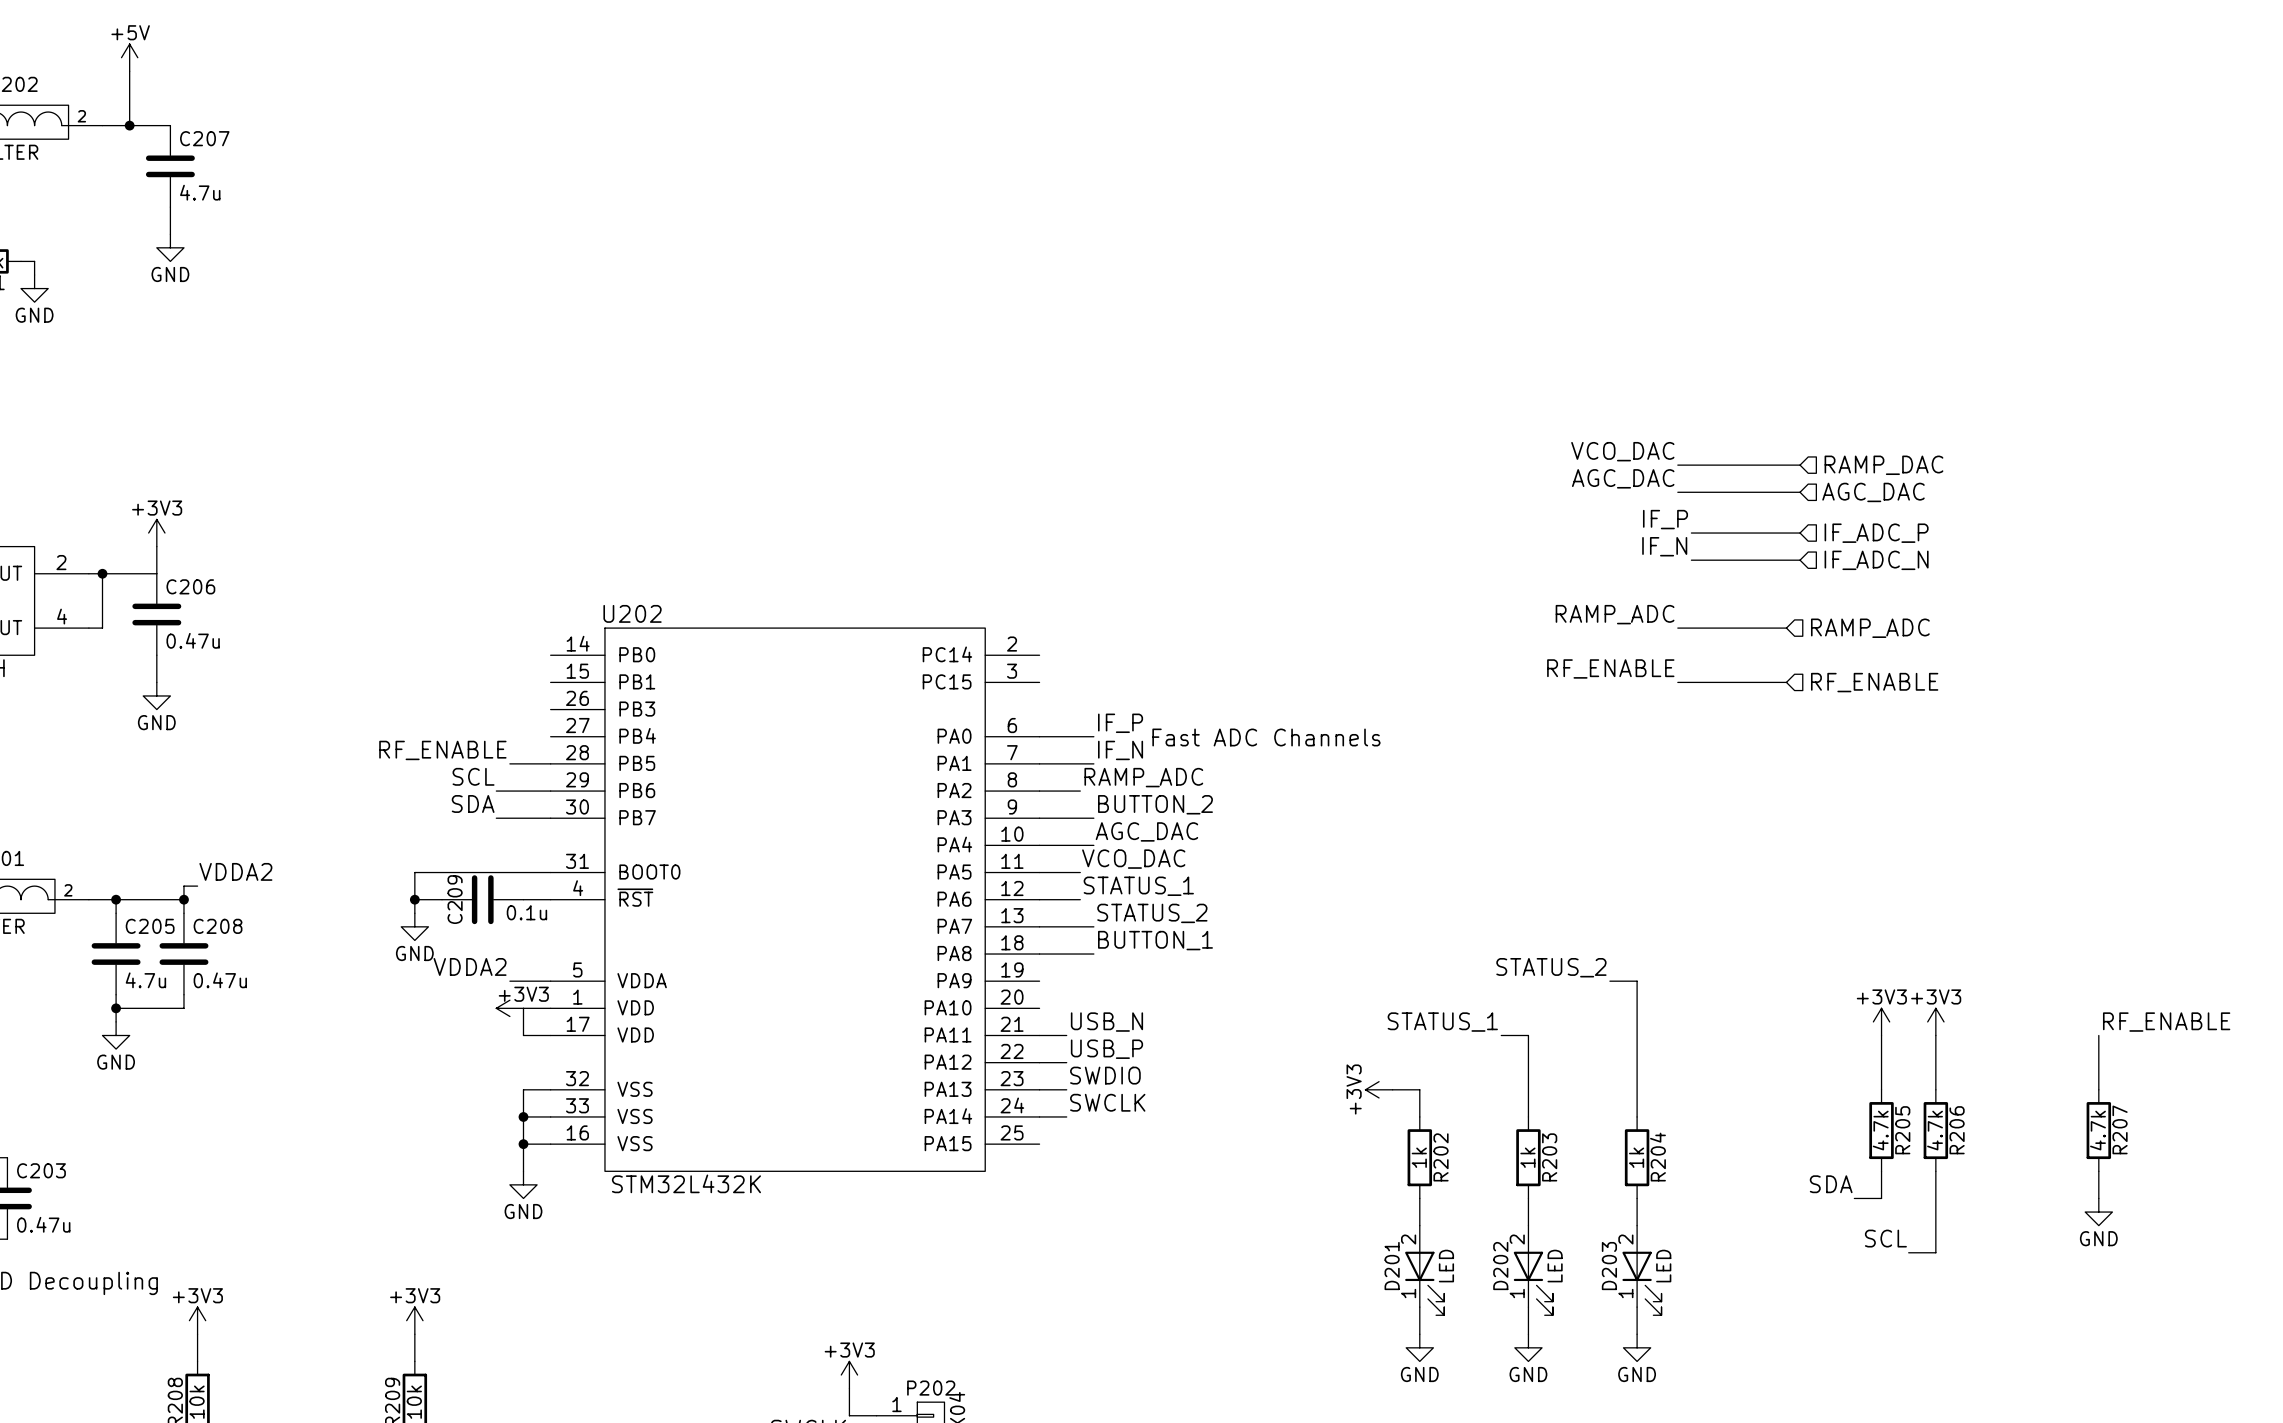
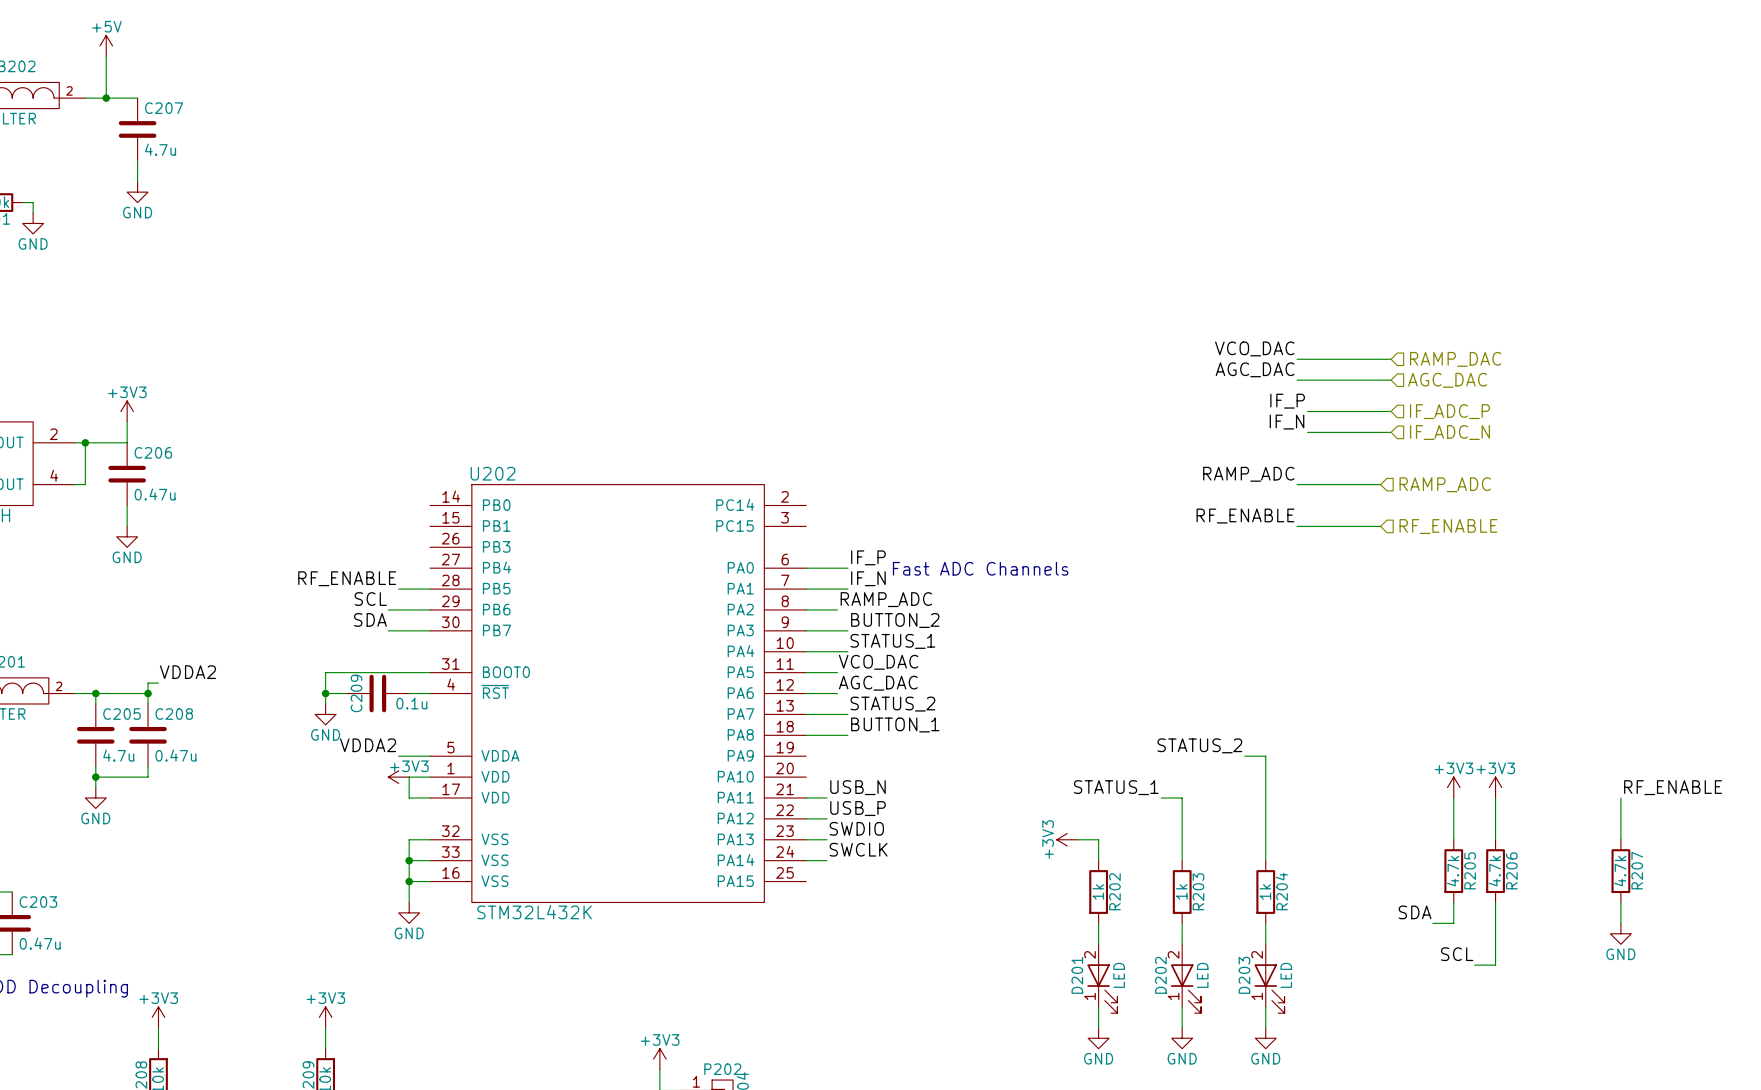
label: AGC_DAC (1146, 831) -> STATUS_1 (892, 641)
label: STATUS_1 (1138, 886) -> AGC_DAC (878, 683)

